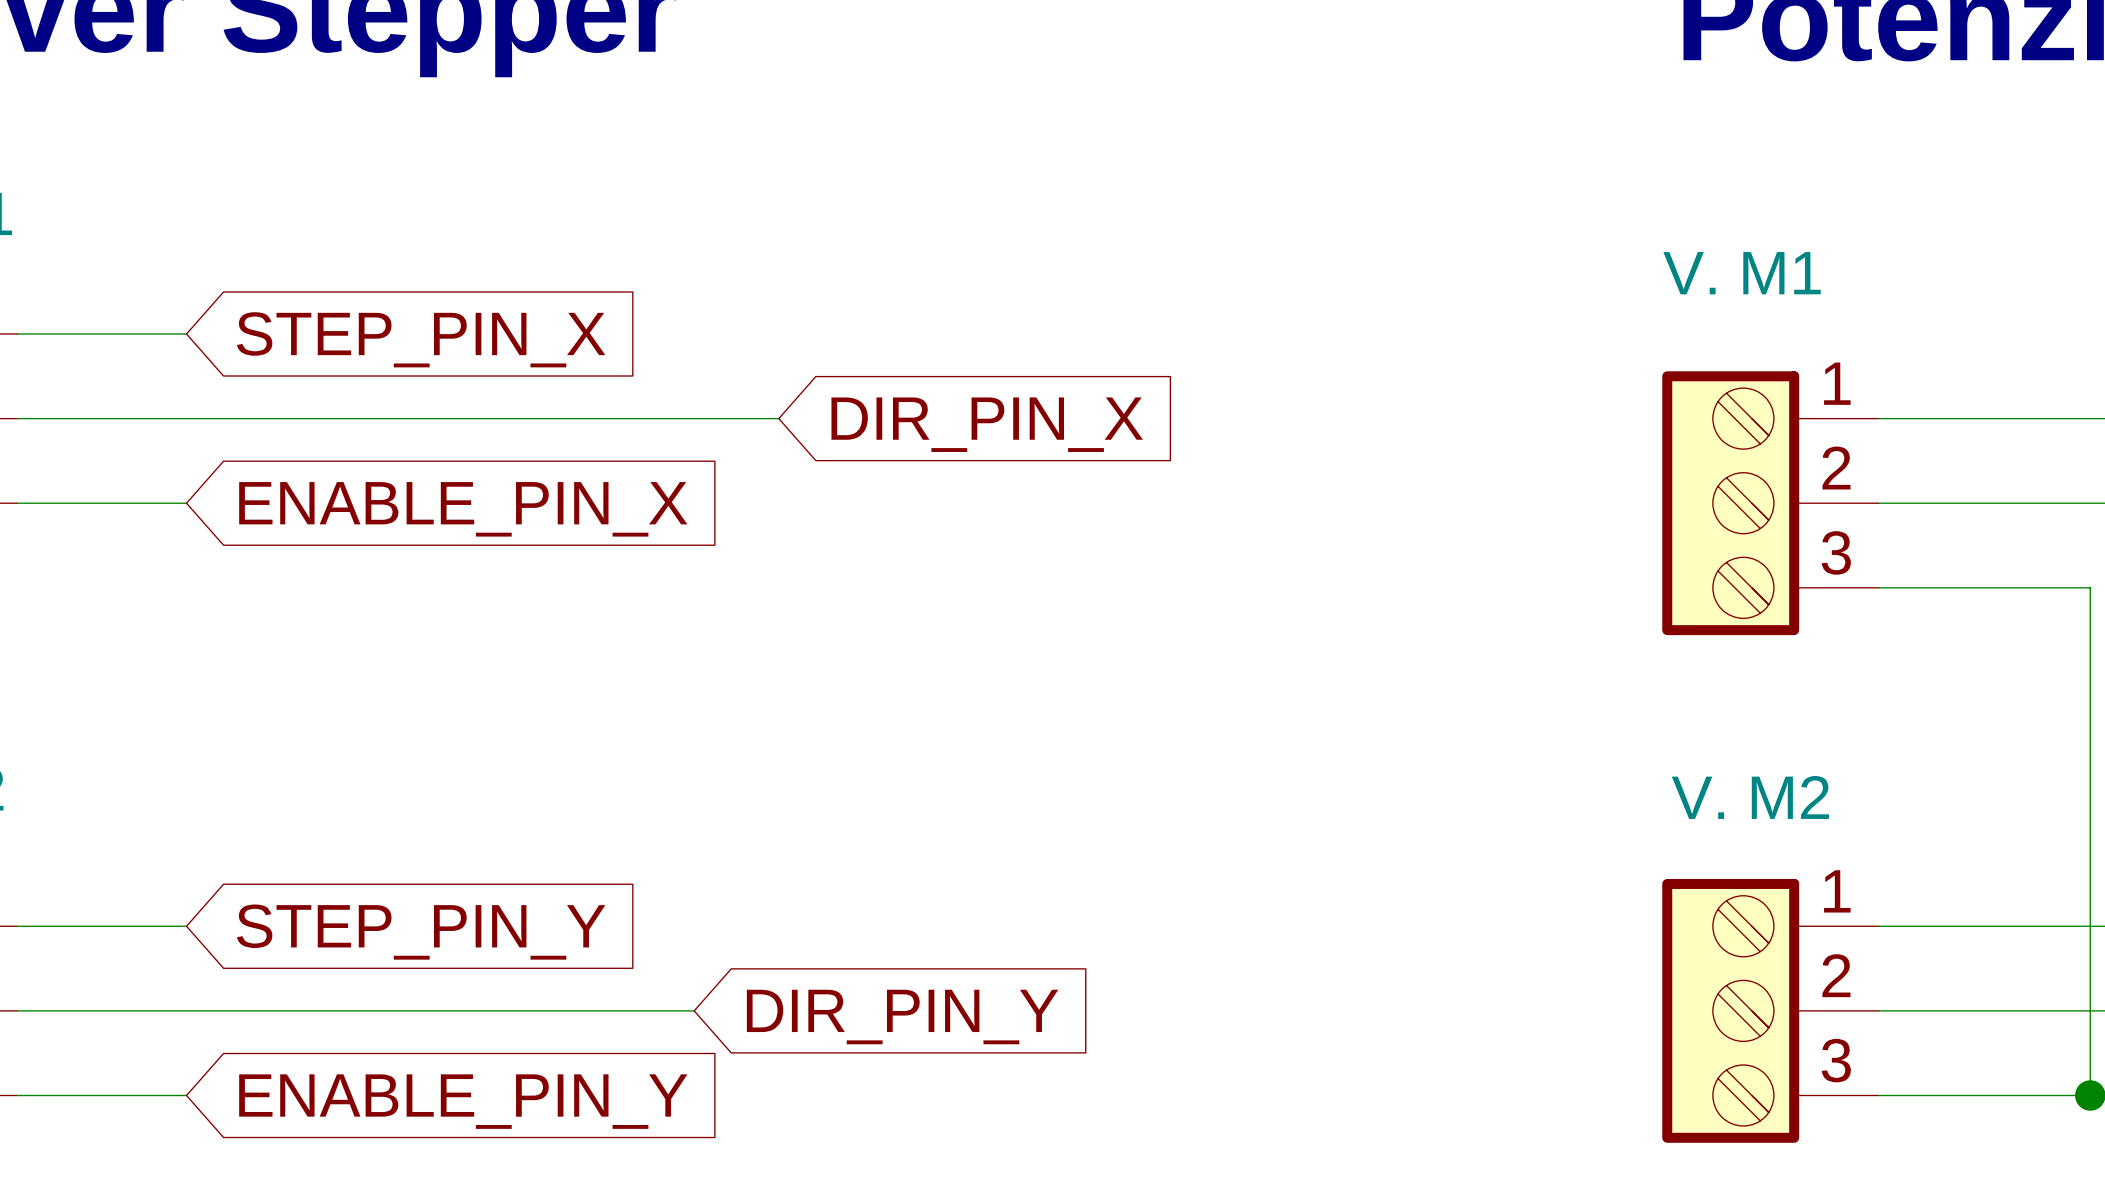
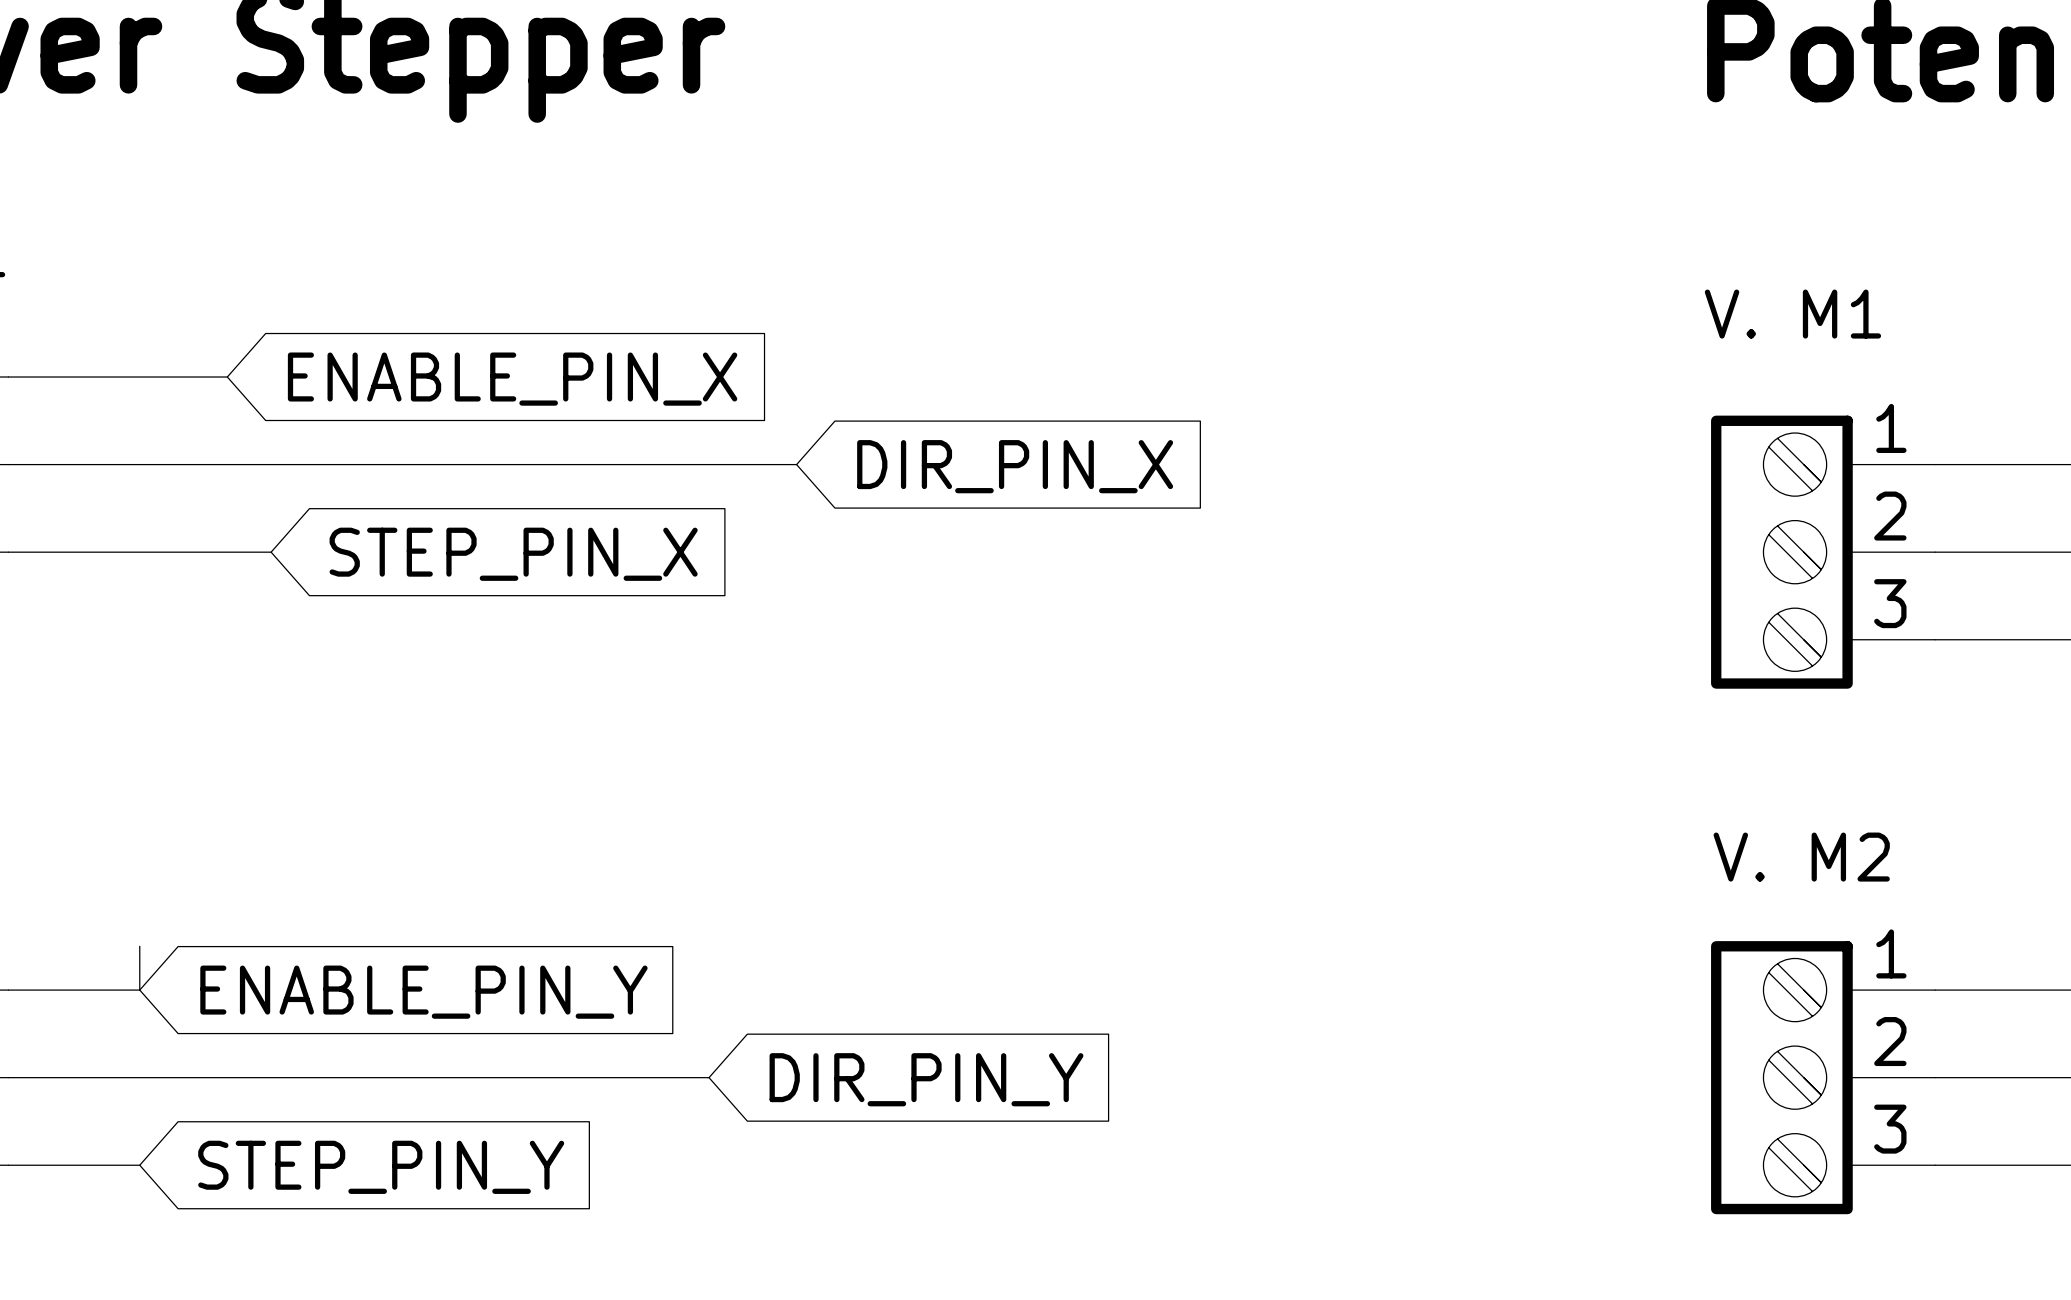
global label position: STEP_PIN_X (421, 339) -> STEP_PIN_X (513, 554)
wire: none -> (183, 552) (271, 552)
global label position: ENABLE_PIN_X (463, 509) -> ENABLE_PIN_X (512, 379)
wire: (144, 926) (186, 926) -> (139, 990) (139, 946)
global label position: STEP_PIN_Y (421, 932) -> STEP_PIN_Y (381, 1167)
wire: (144, 1095) (186, 1095) -> (183, 377) (227, 377)
global label position: ENABLE_PIN_Y (463, 1101) -> ENABLE_PIN_Y (423, 992)

